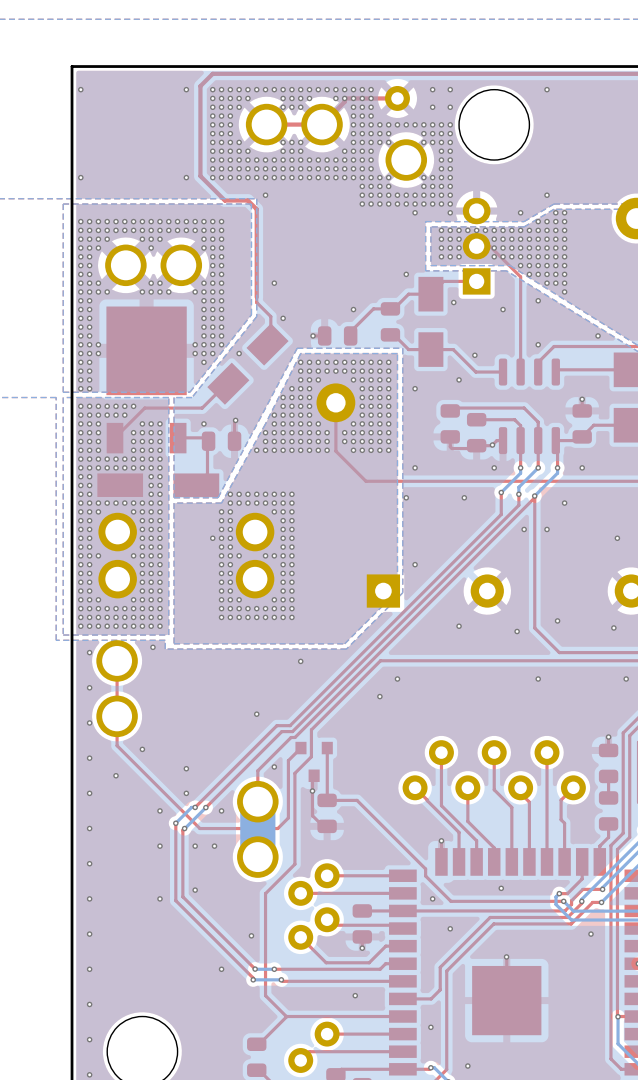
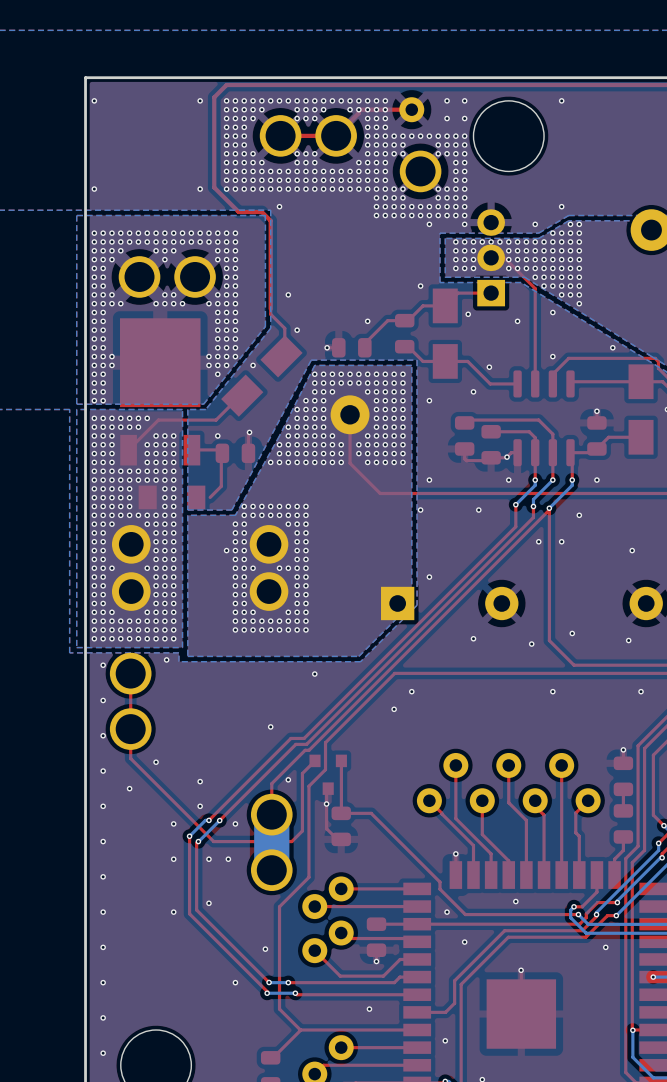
part footprint: [97, 473, 220, 498] -> [138, 485, 206, 510]
via: none -> (111, 488)
via: none -> (120, 488)
via: none -> (129, 488)
via: none -> (111, 497)
via: none -> (120, 497)
via: none -> (129, 497)
via: none -> (111, 506)
via: none -> (120, 506)
via: none -> (129, 506)

